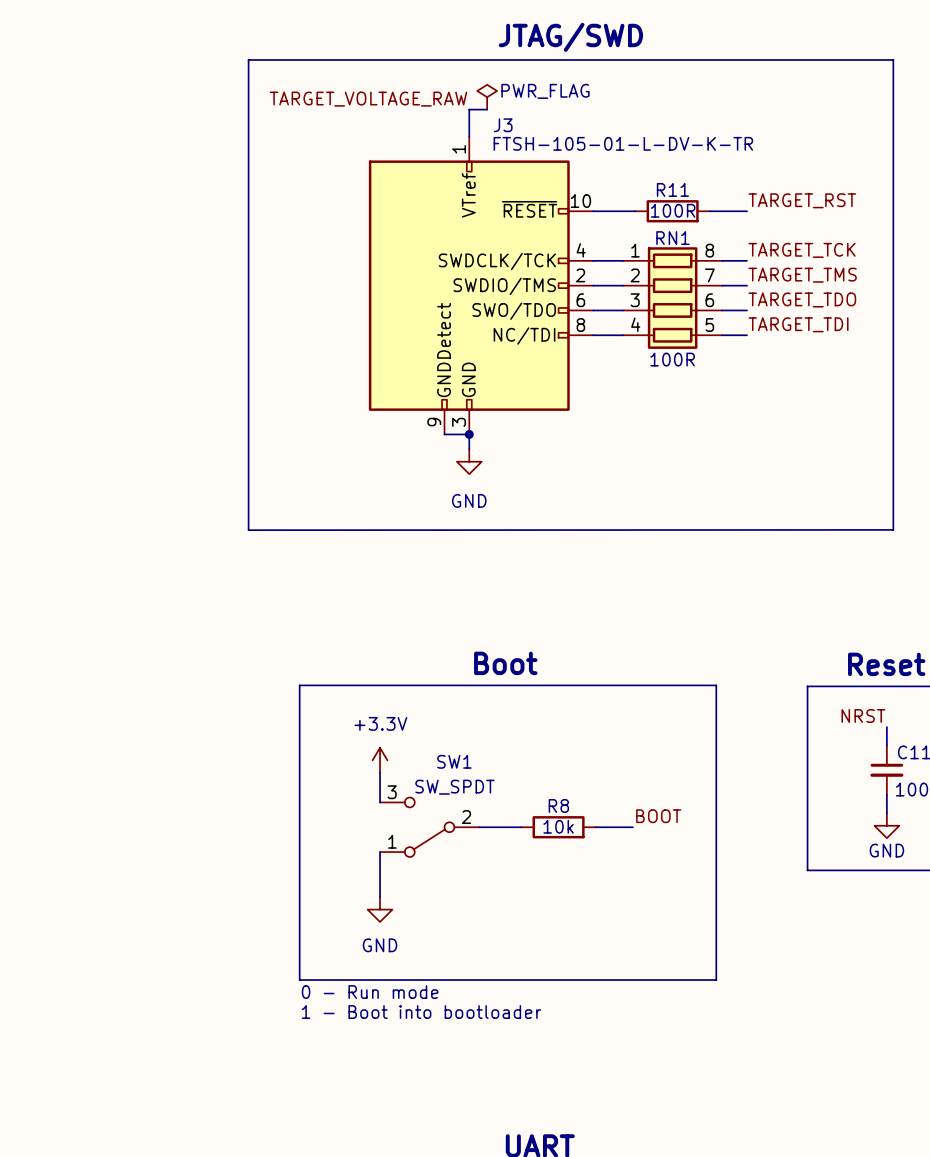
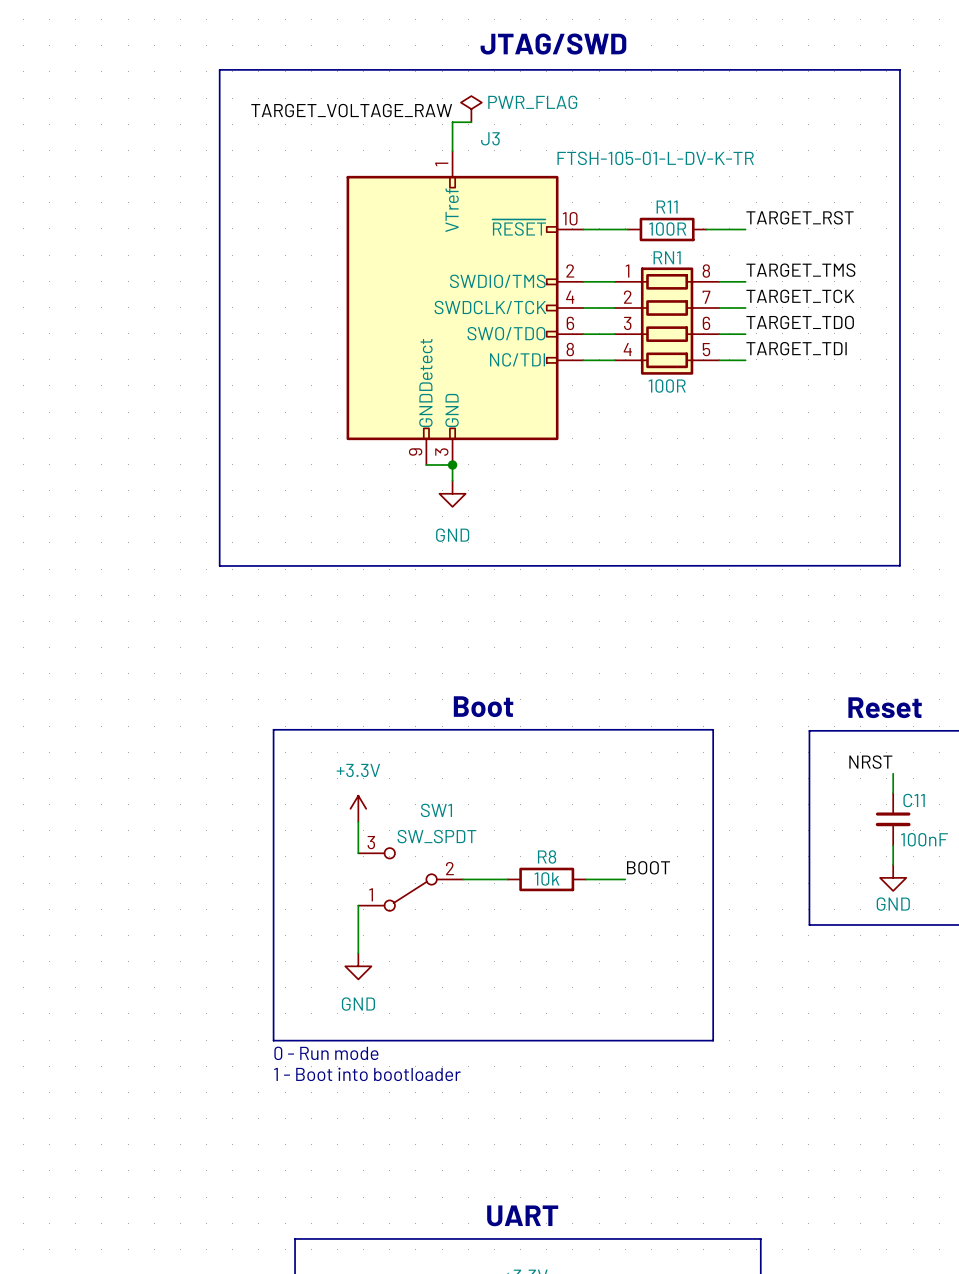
J3 pin number: 4 (581, 250) -> 2 (570, 270)
label: TARGET_TCK (802, 250) -> TARGET_TMS (800, 270)
J3 pin name: SWDCLK/TCK (497, 261) -> SWDIO/TMS (497, 281)
J3 pin number: 2 (580, 275) -> 4 (570, 297)
label: TARGET_TMS (802, 275) -> TARGET_TCK (800, 296)
J3 pin name: SWDIO/TMS (504, 286) -> SWDCLK/TCK (490, 307)

